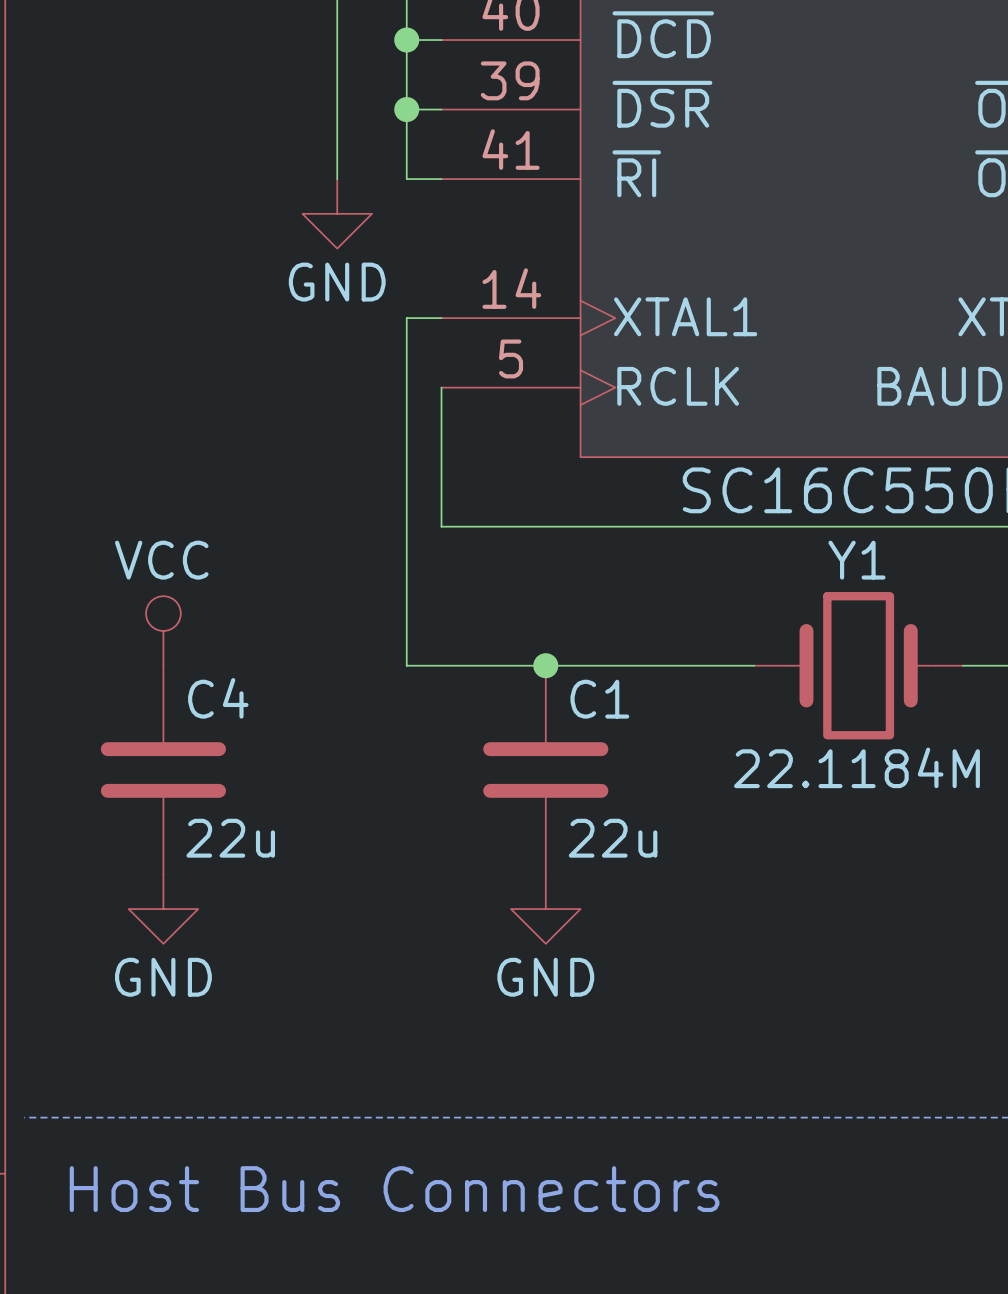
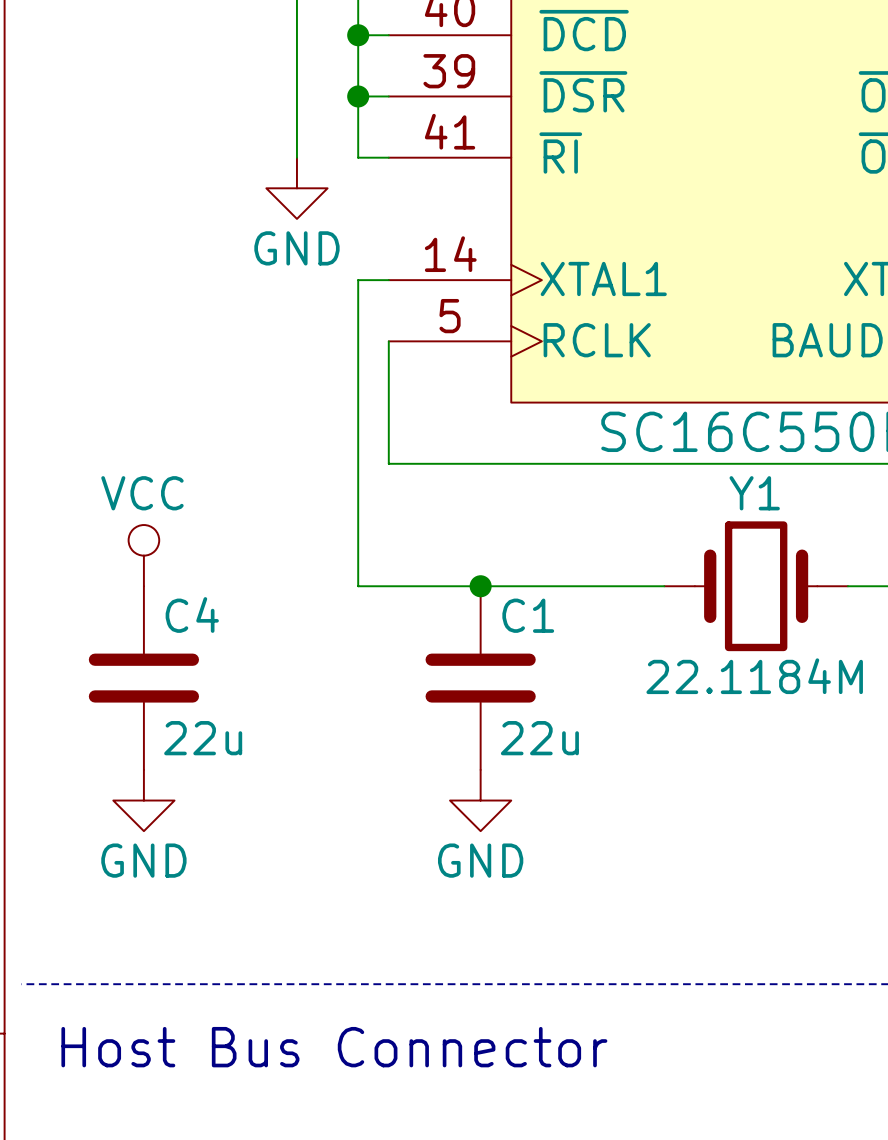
text: Host Bus Connectors (394, 1189) -> Host Bus Connector (334, 1047)

